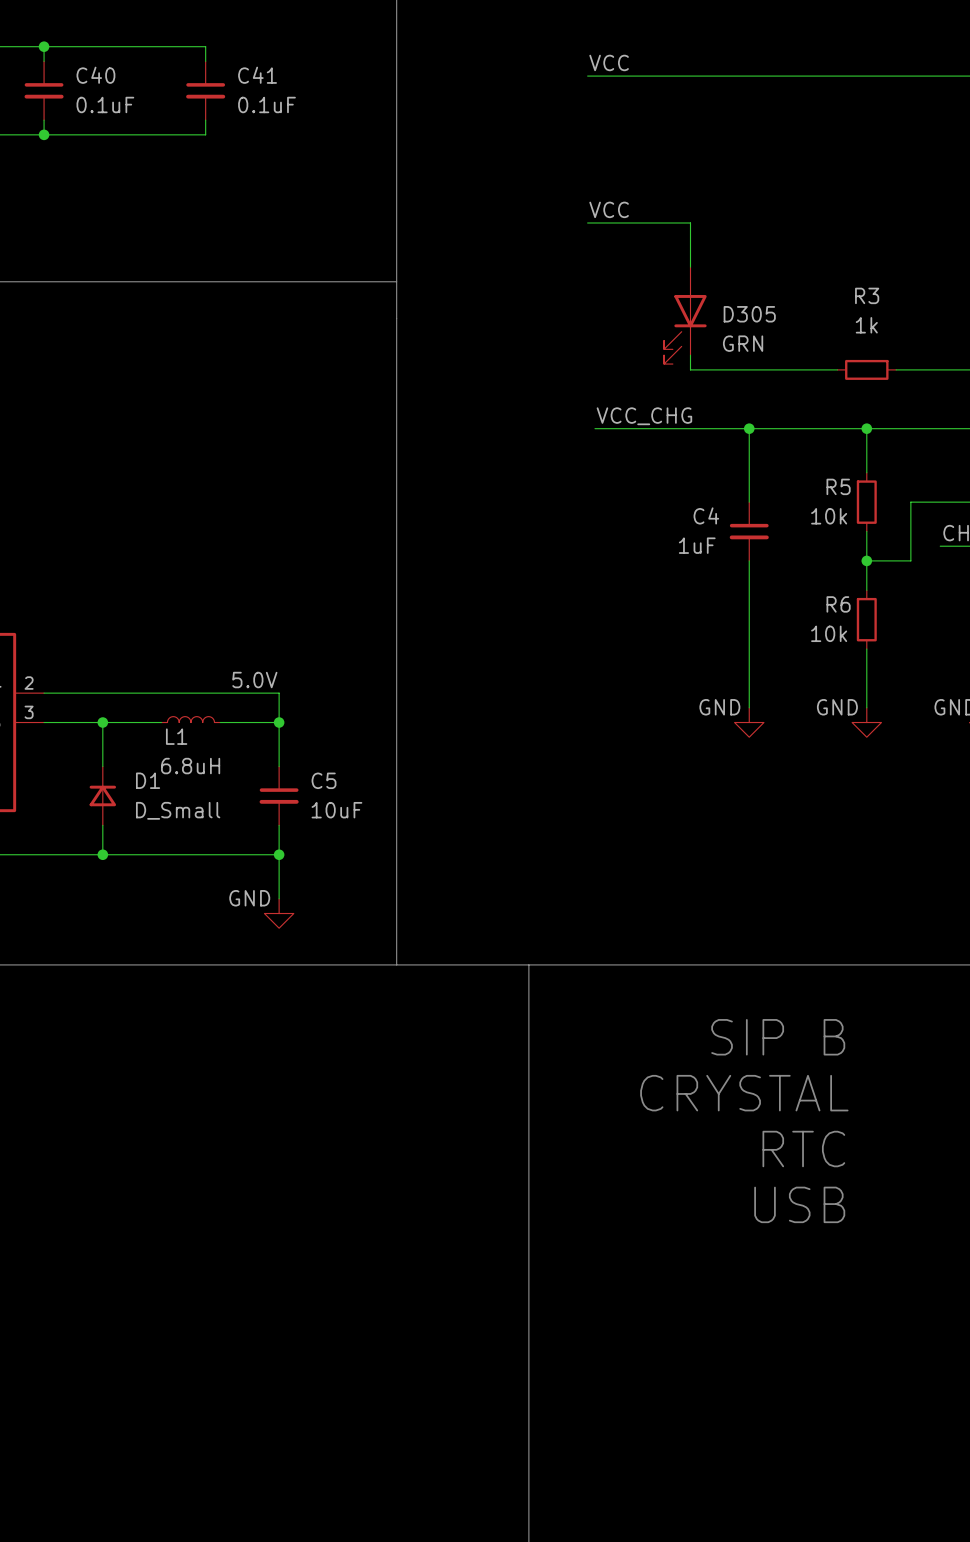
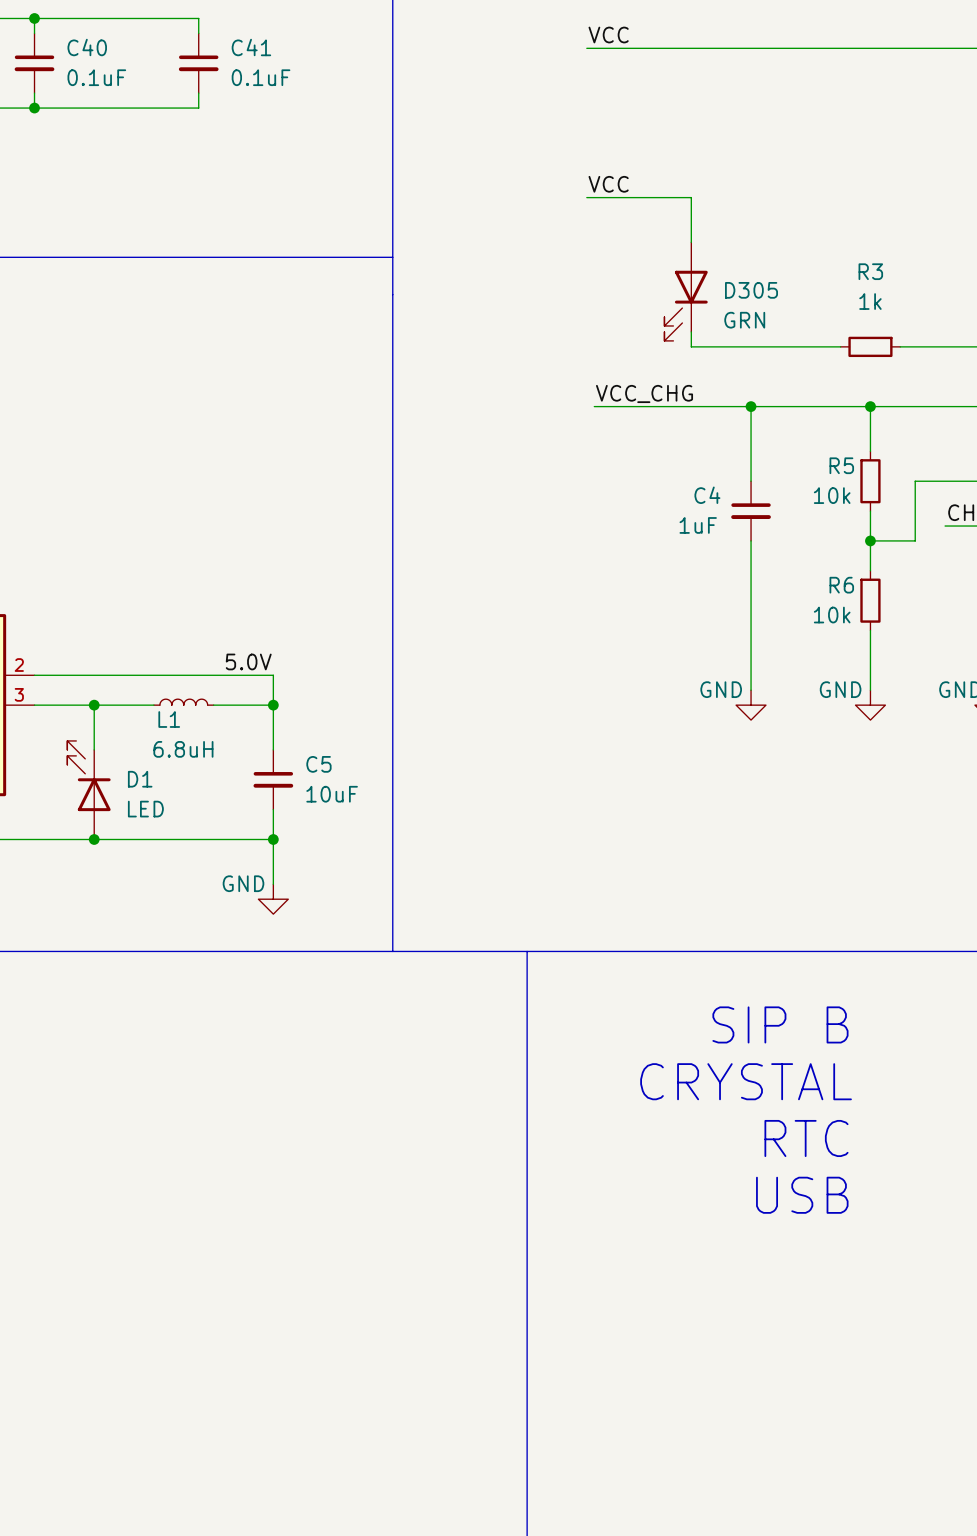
D1 symbol: [89, 766, 117, 826] -> [67, 740, 111, 840]
D1 value: D_Small (178, 810) -> LED (145, 809)

